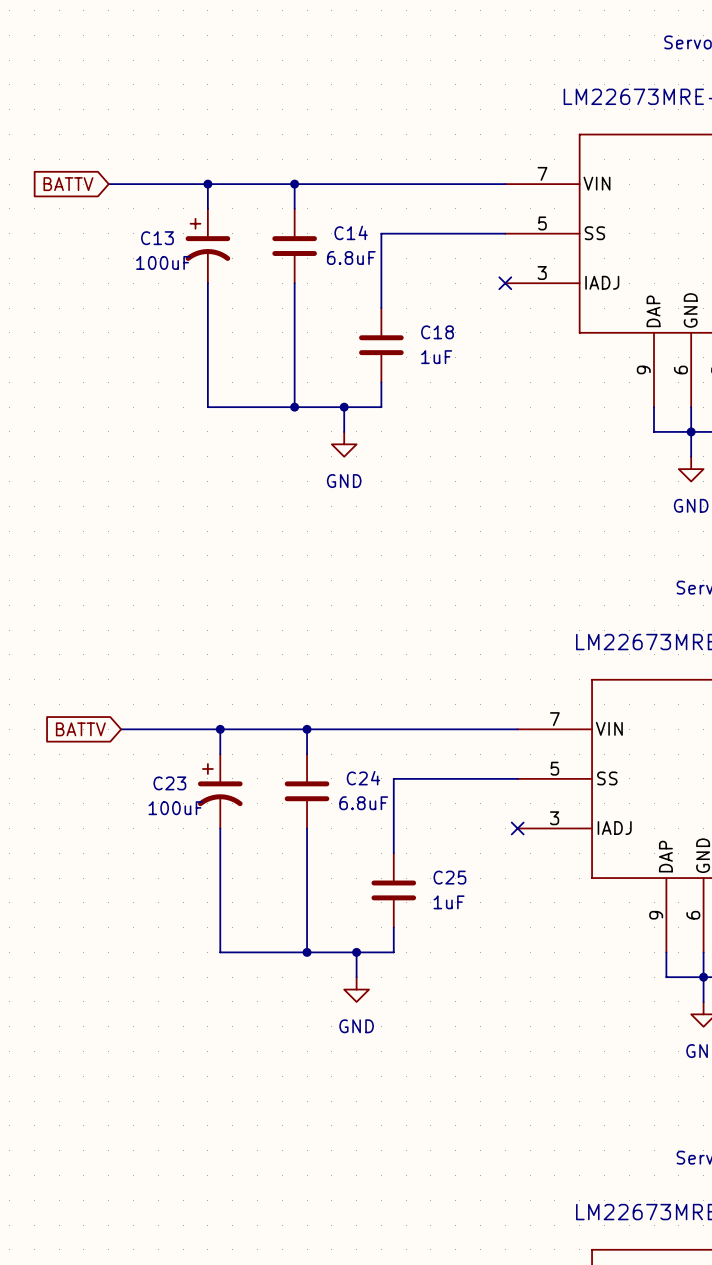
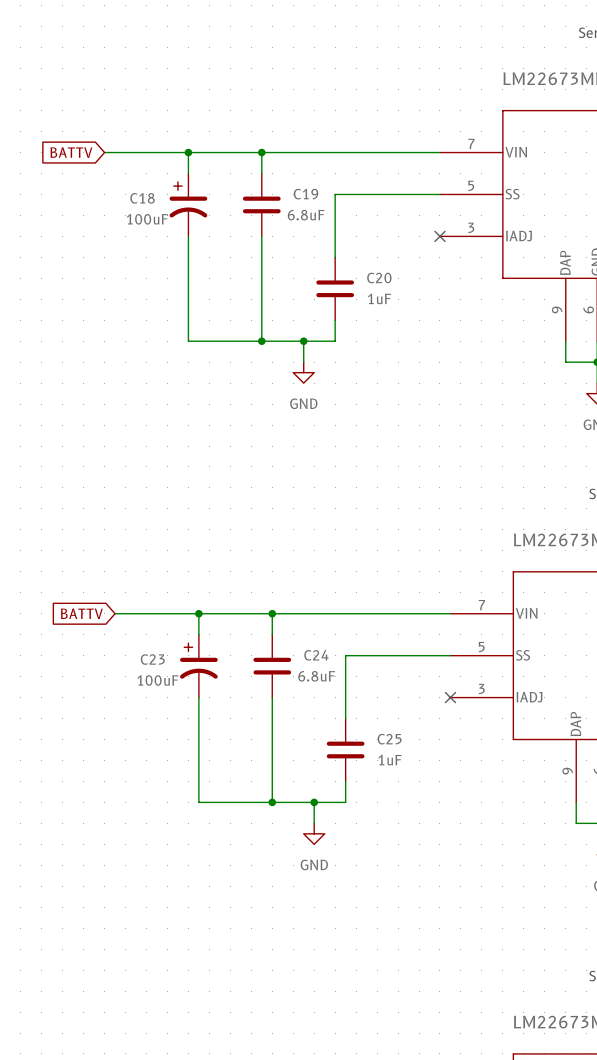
C14 name: C14 (351, 232) -> C19 (306, 194)
C13 name: C13 (157, 238) -> C18 (142, 198)
C18 name: C18 (437, 332) -> C20 (379, 278)

